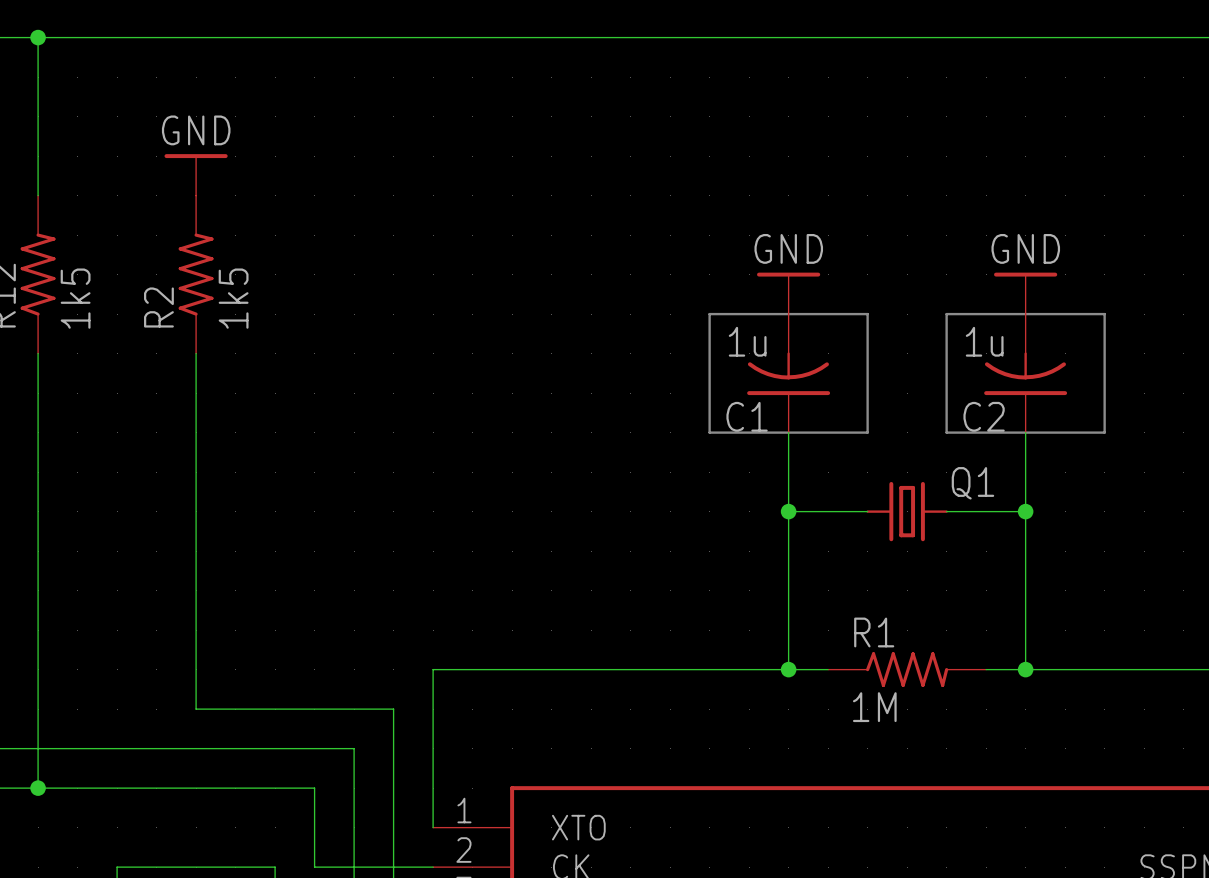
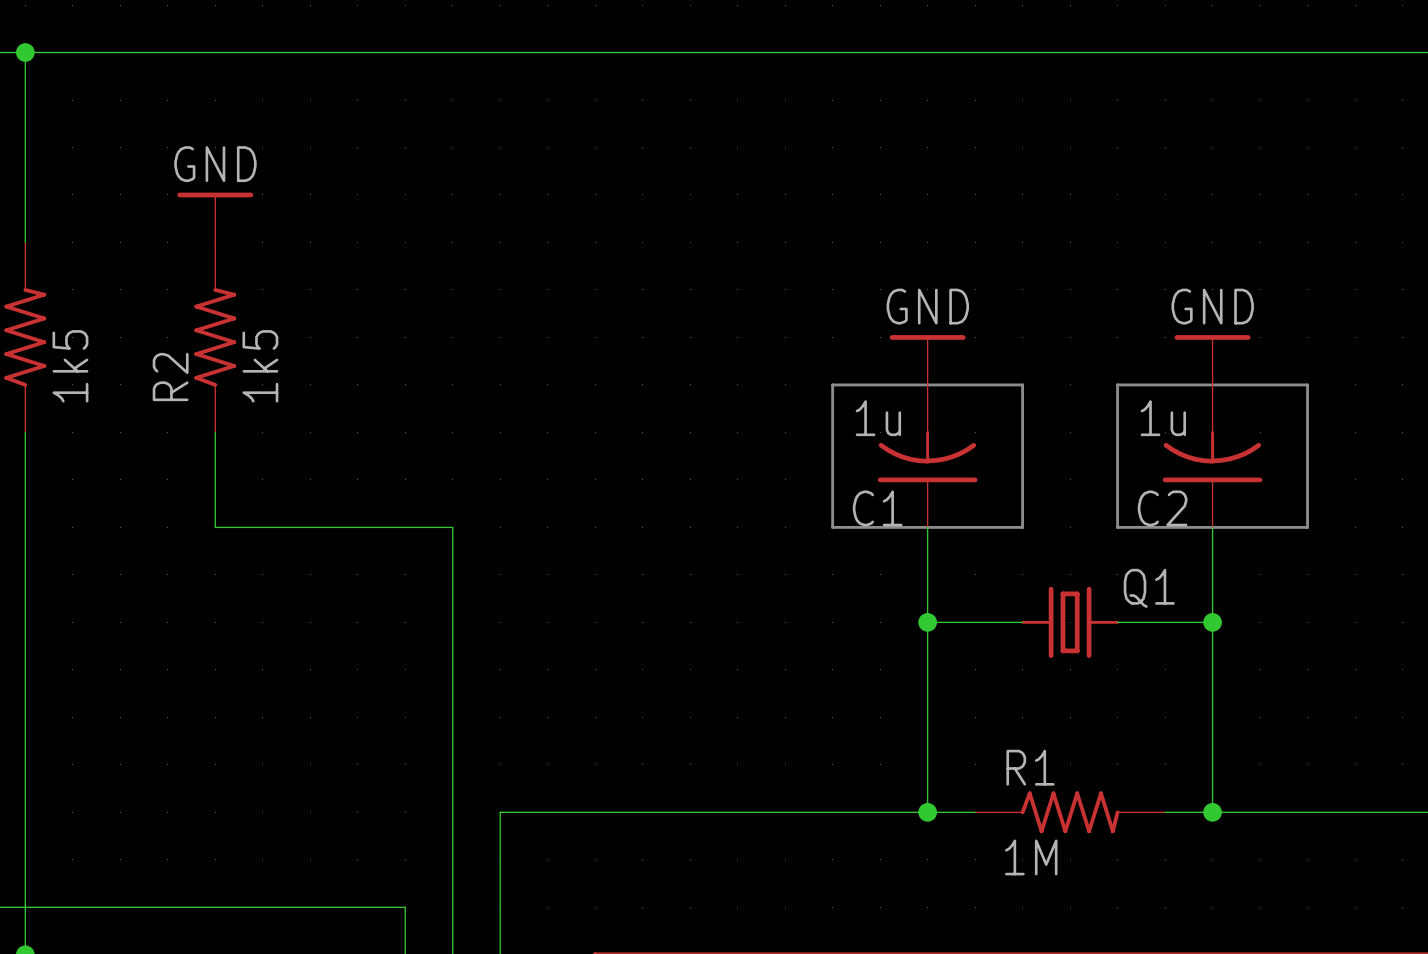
wire: (196, 432) (196, 709) (393, 709) -> (215, 527) (452, 527) (452, 859)

